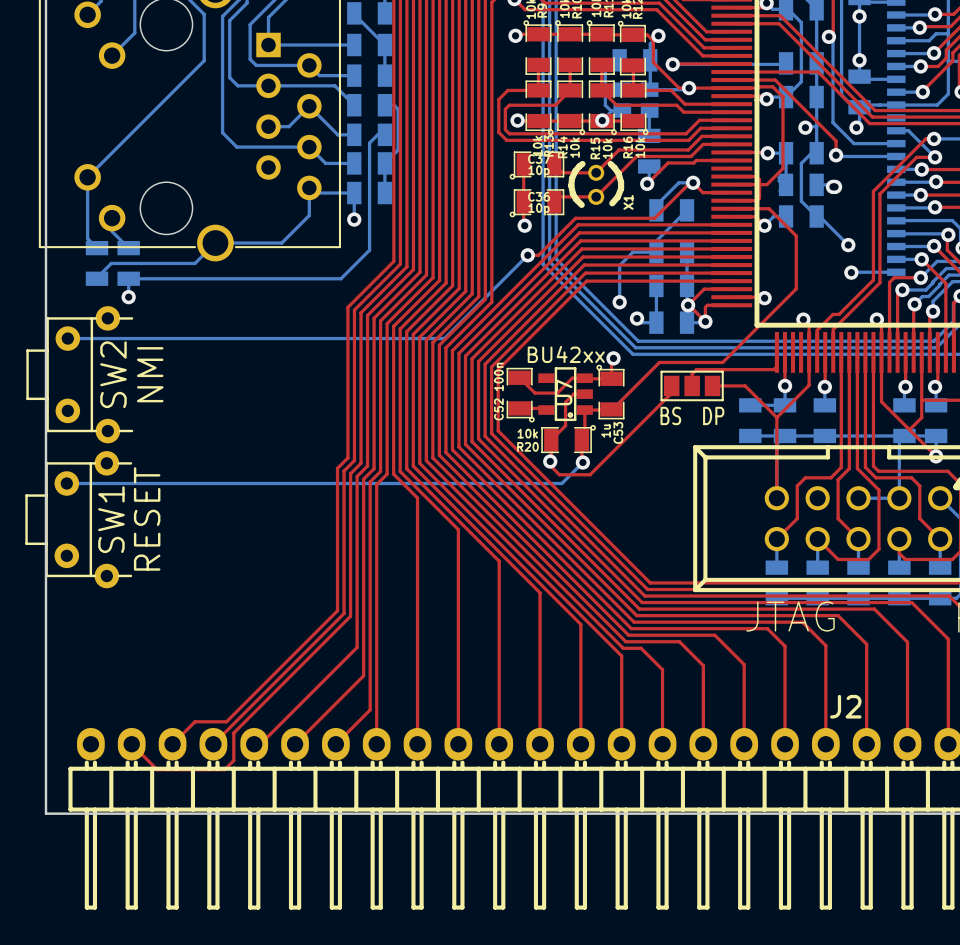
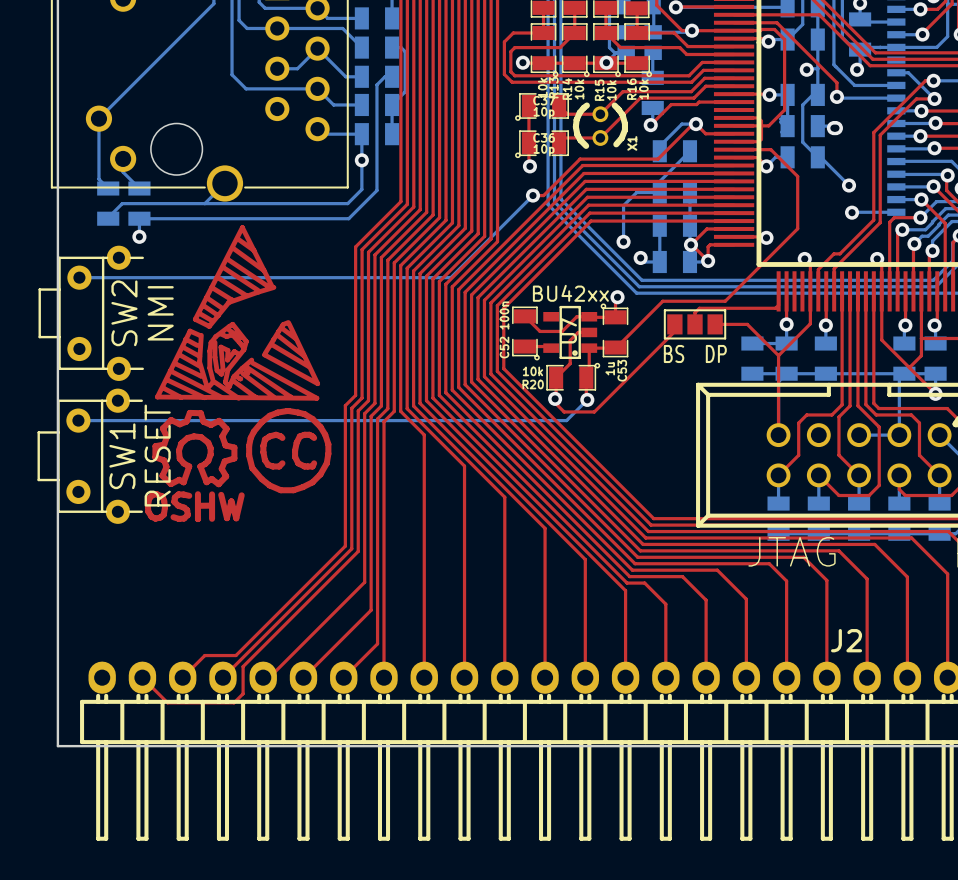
bottom track: (309, 187) (309, 215) (281, 243) (215, 243) -> none
bottom track: none -> (361, 160) (361, 189) (347, 203) (204, 203)
drawing: none -> [144, 225, 332, 523]

